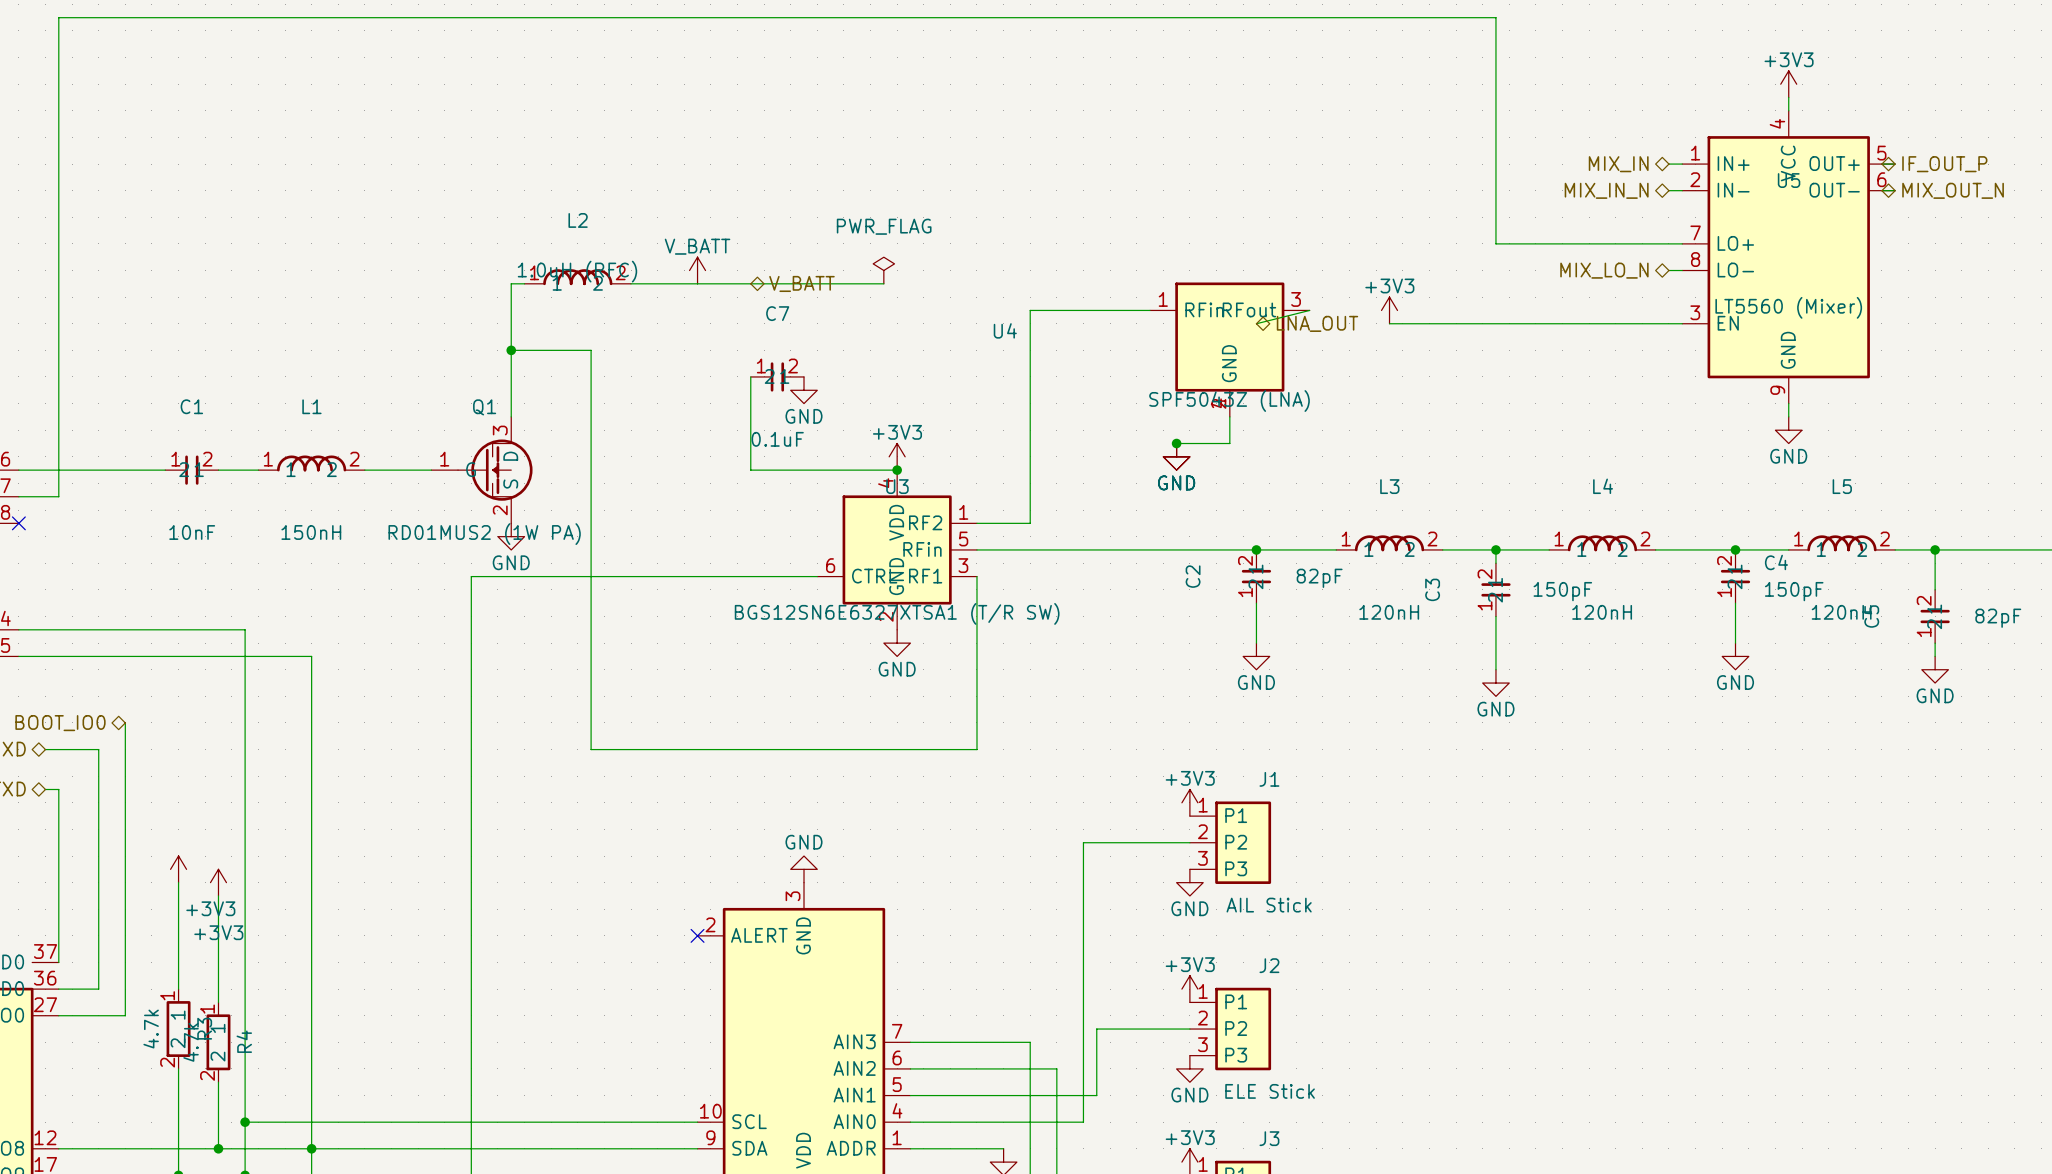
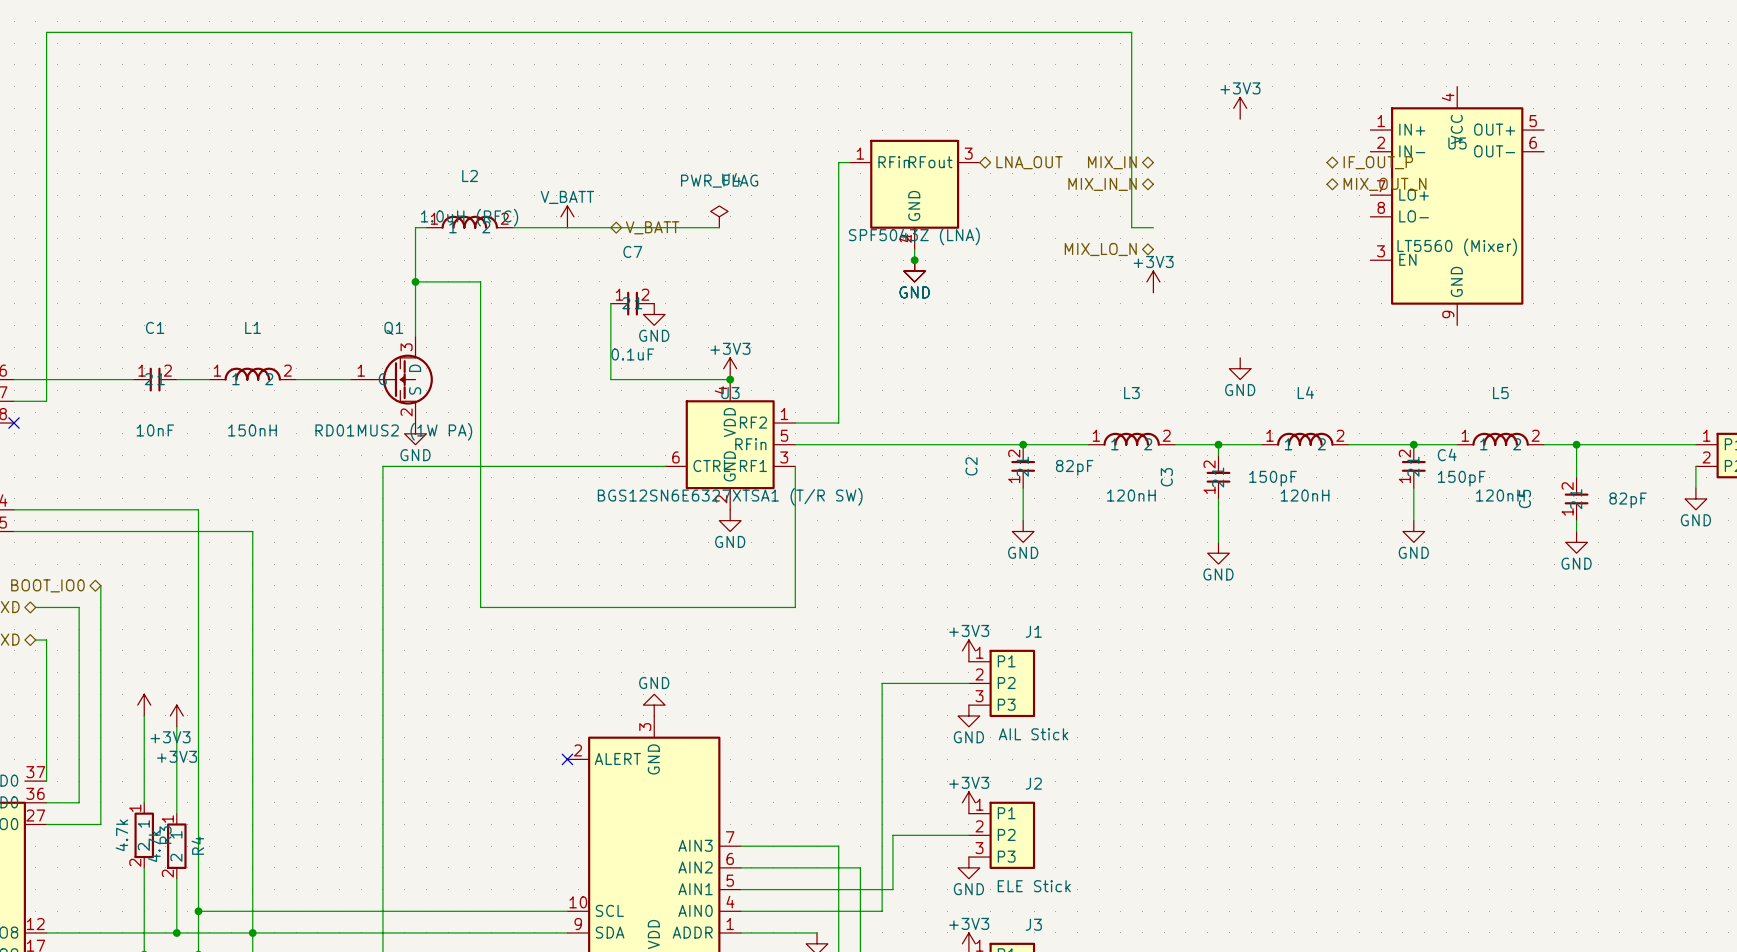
wire: (58, 44) (58, 17) (1495, 17) (1495, 243) (1682, 243) -> (46, 32) (1131, 32) (1131, 227) (1153, 227)
power symbol: +3V3 (1788, 84) -> none
wire: (1788, 97) (1788, 110) -> none
power symbol: none -> +3V3 (1240, 108)
hierarchical label position: MIX_IN (1618, 164) -> MIX_IN (1112, 162)
wire: (1668, 164) (1682, 164) -> none
hierarchical label position: IF_OUT_P (1944, 164) -> IF_OUT_P (1378, 162)
hierarchical label position: MIX_IN_N (1606, 190) -> MIX_IN_N (1102, 184)
wire: (1668, 190) (1682, 190) -> none
hierarchical label position: MIX_OUT_N (1953, 190) -> MIX_OUT_N (1385, 184)
hierarchical label position: MIX_LO_N (1604, 270) -> MIX_LO_N (1100, 249)
wire: (1668, 270) (1682, 270) -> none
wire: (1030, 310) (1149, 310) -> (838, 249) (838, 162) (849, 162)
wire: none -> (914, 249) (914, 260)
wire: (1309, 310) (1256, 323) -> none
power symbol position: +3V3 (1389, 310) -> +3V3 (1153, 281)
junction: none -> (914, 260)
hierarchical label position: LNA_OUT (1317, 323) -> LNA_OUT (1029, 162)
wire: (1389, 323) (1682, 323) -> none
U4 position: (1229, 349) -> (914, 194)
wire: (1788, 403) (1788, 416) -> none
wire: (1229, 416) (1229, 443) (1176, 443) -> none
power symbol: GND (1788, 430) -> none
junction: (1176, 443) -> none
power symbol position: GND (1176, 456) -> GND (914, 271)
power symbol: none -> GND (1240, 368)

